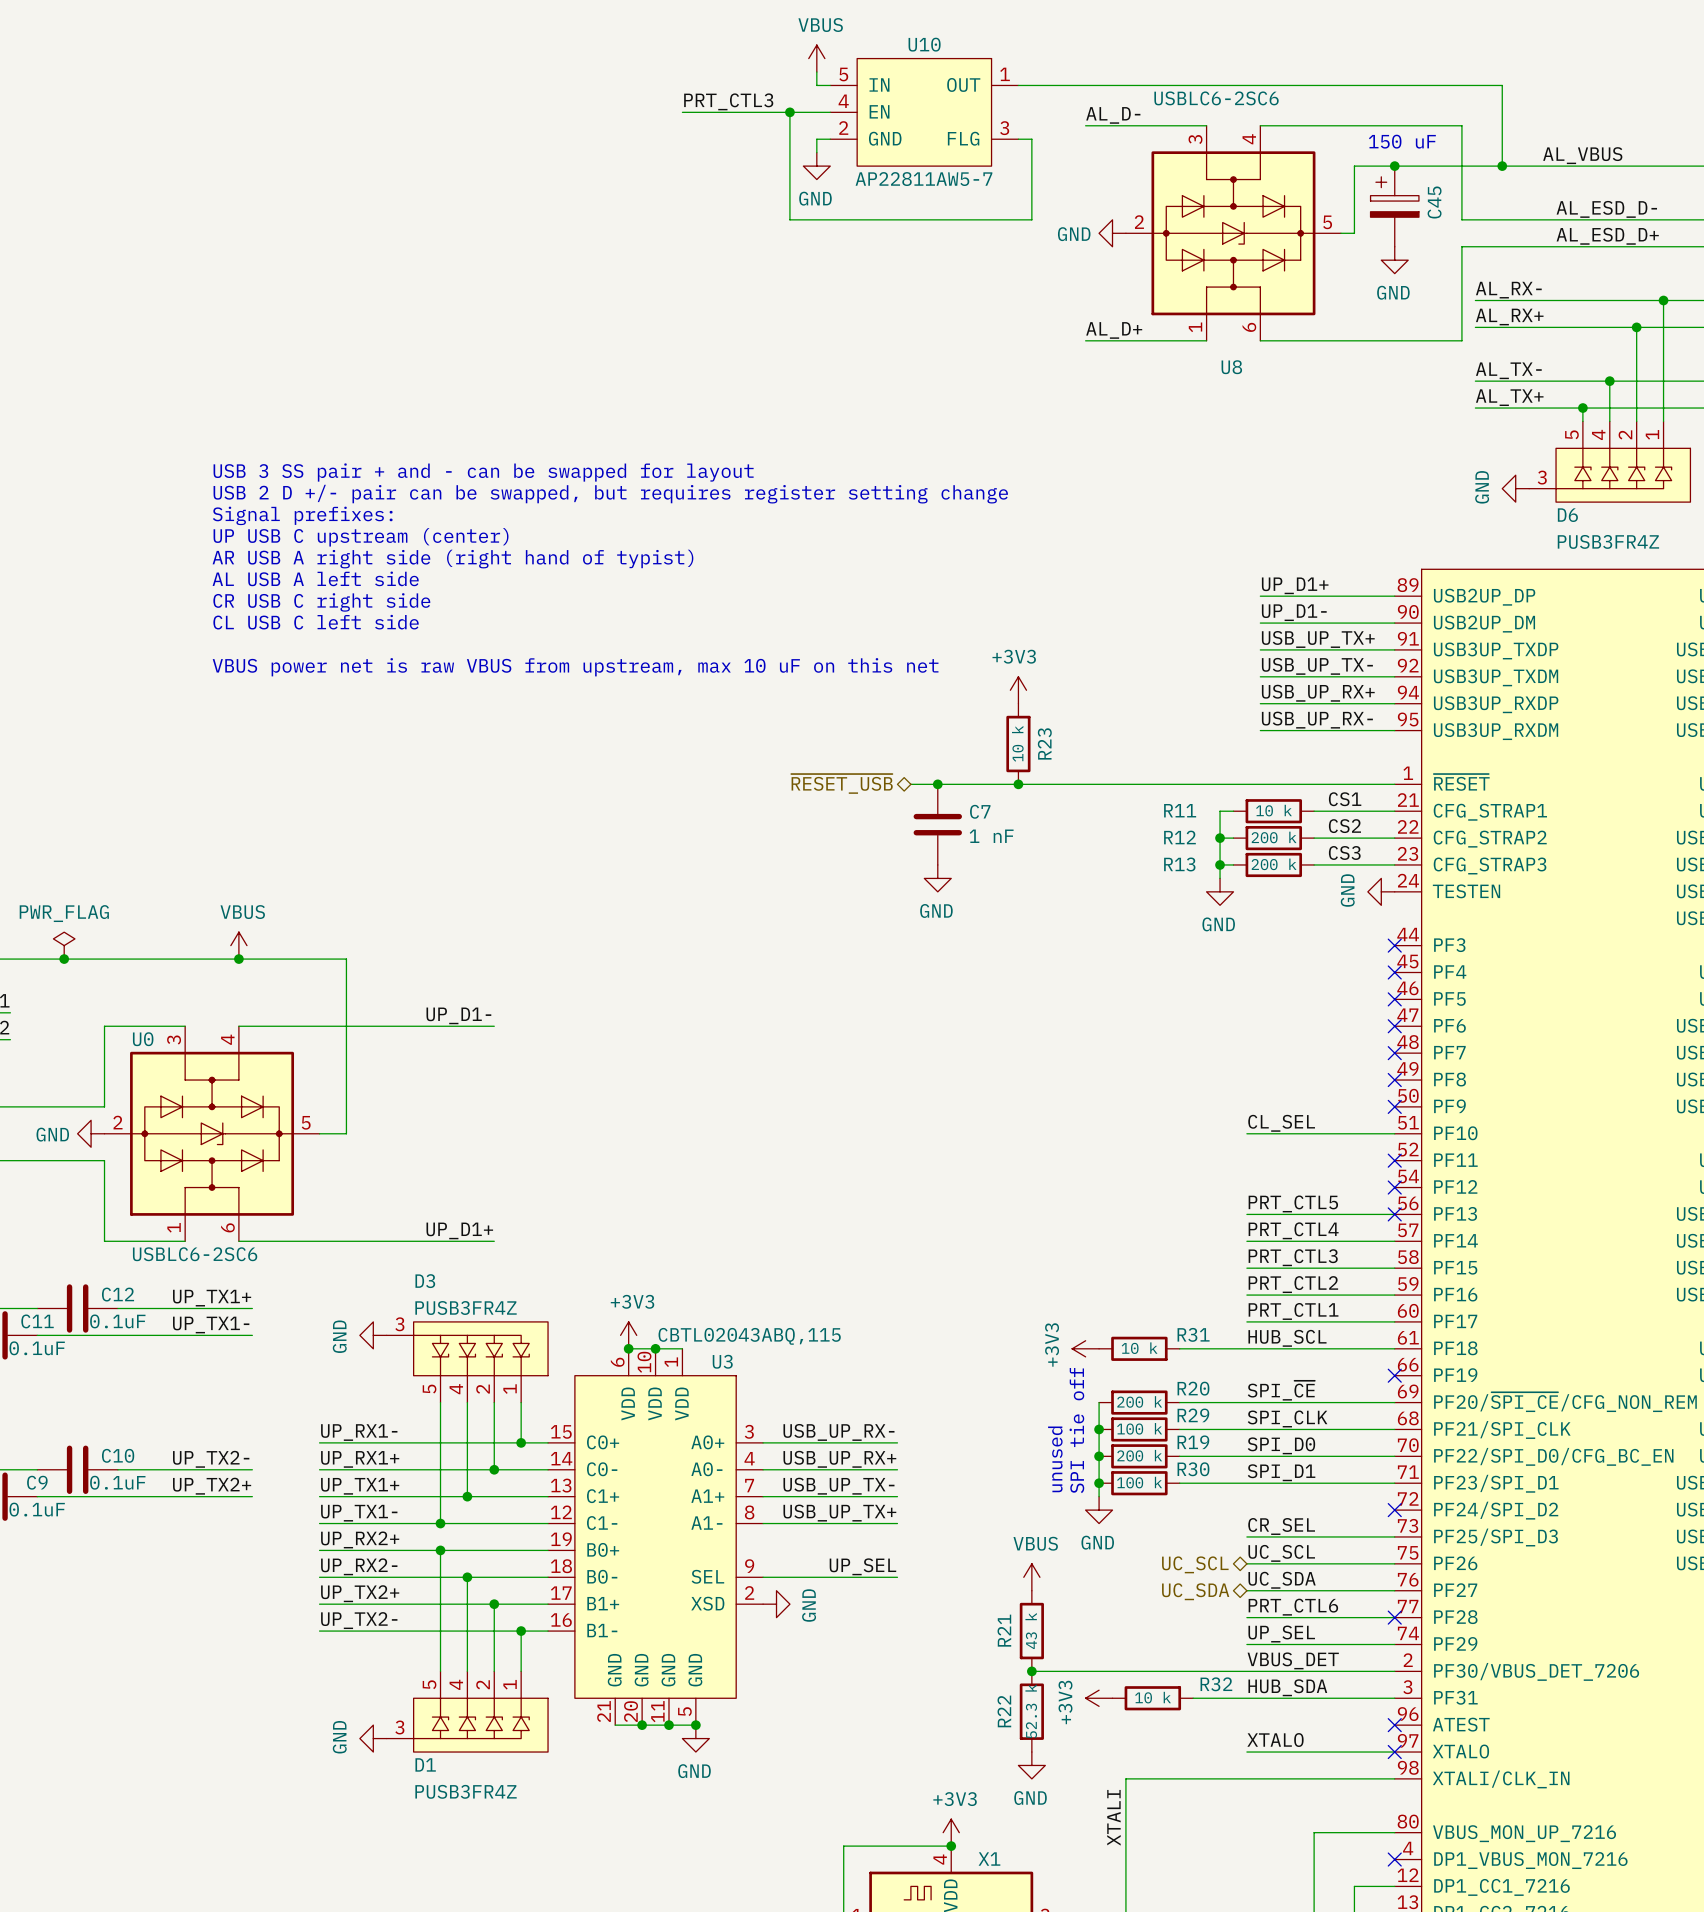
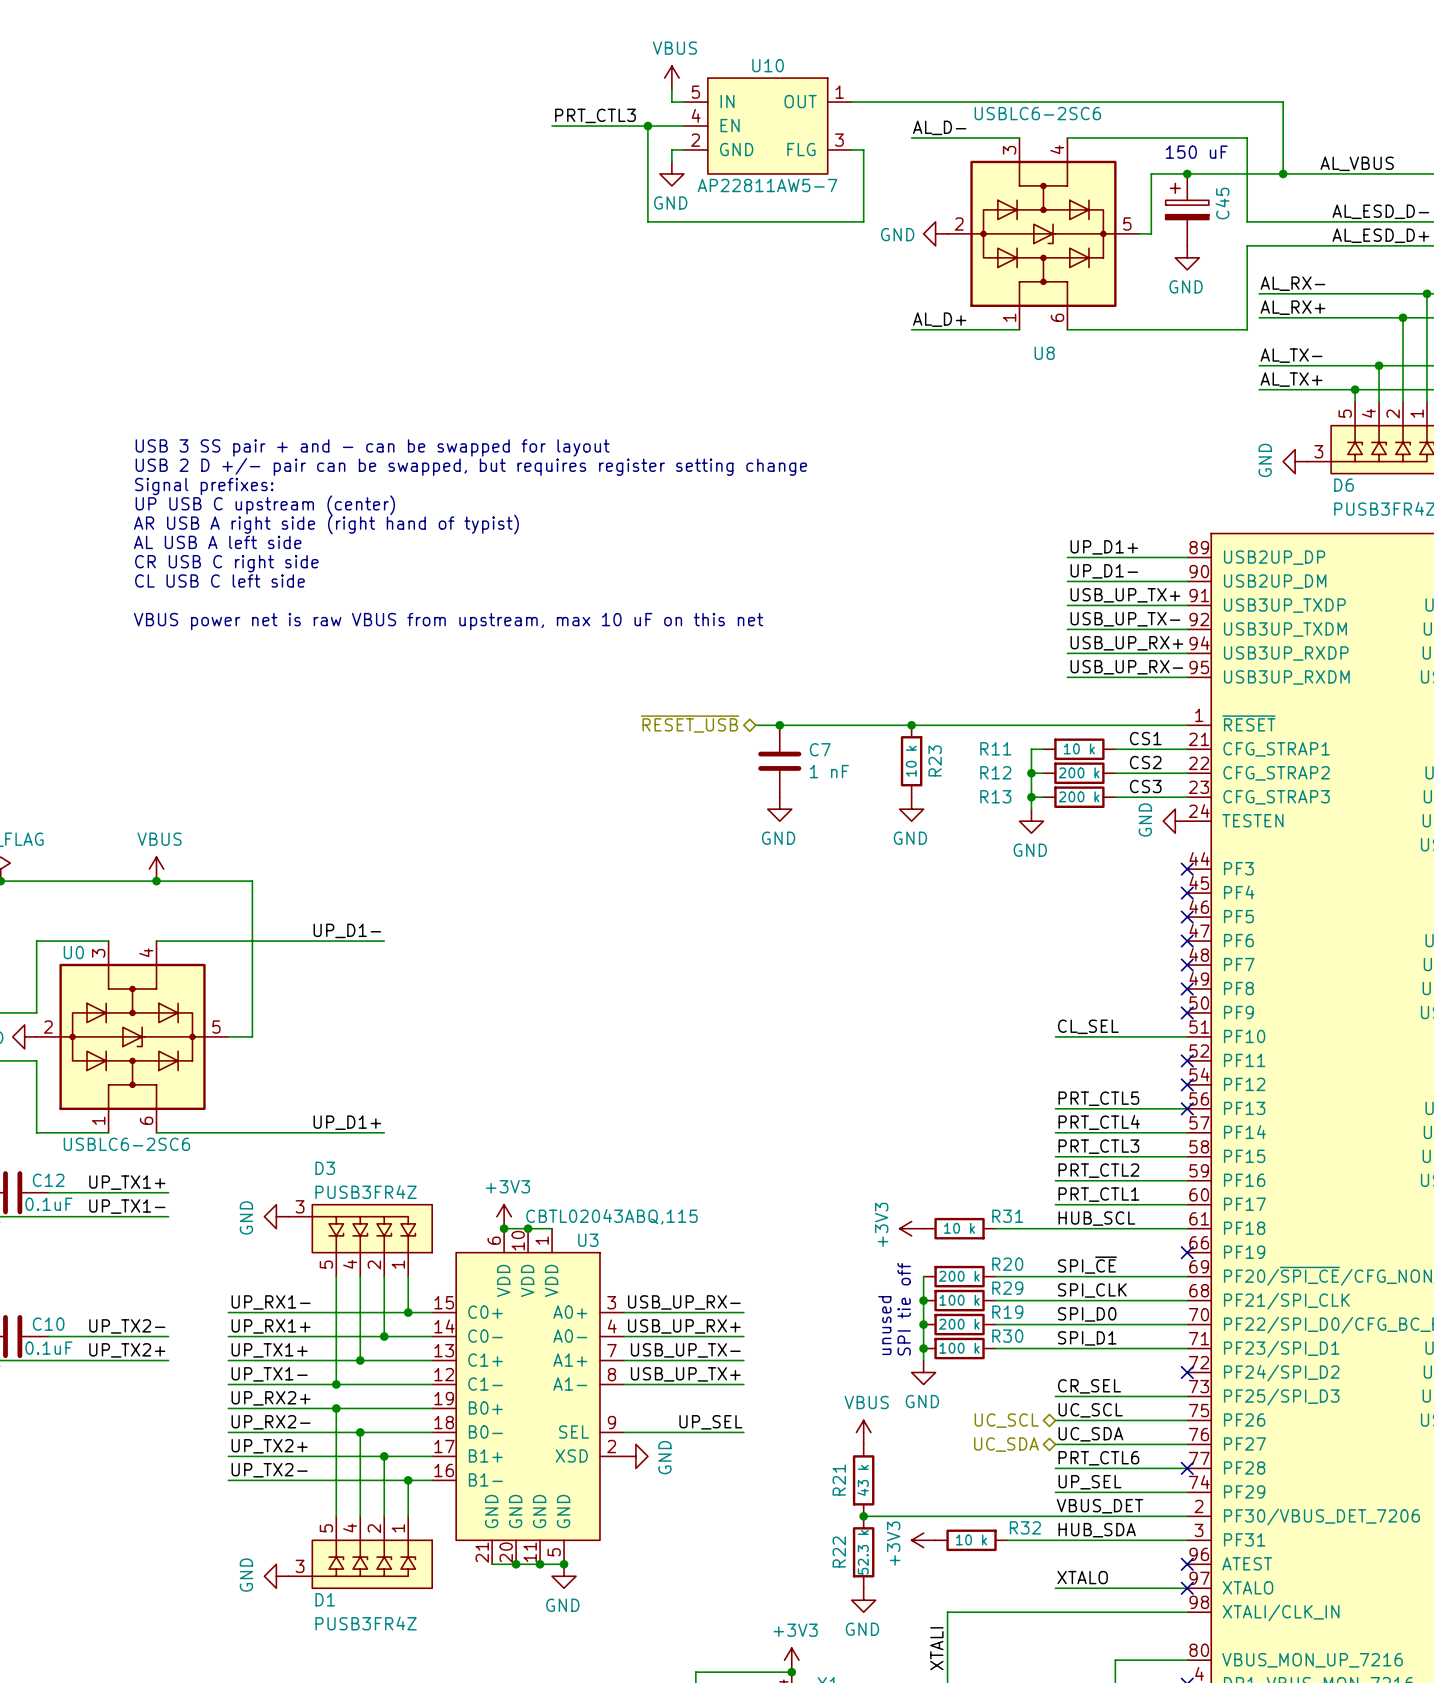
power symbol: +3V3 (1018, 690) -> none
R23 position: (1018, 744) -> (911, 761)
junction: (1018, 784) -> none
junction: none -> (911, 725)
power symbol: none -> GND (911, 809)

